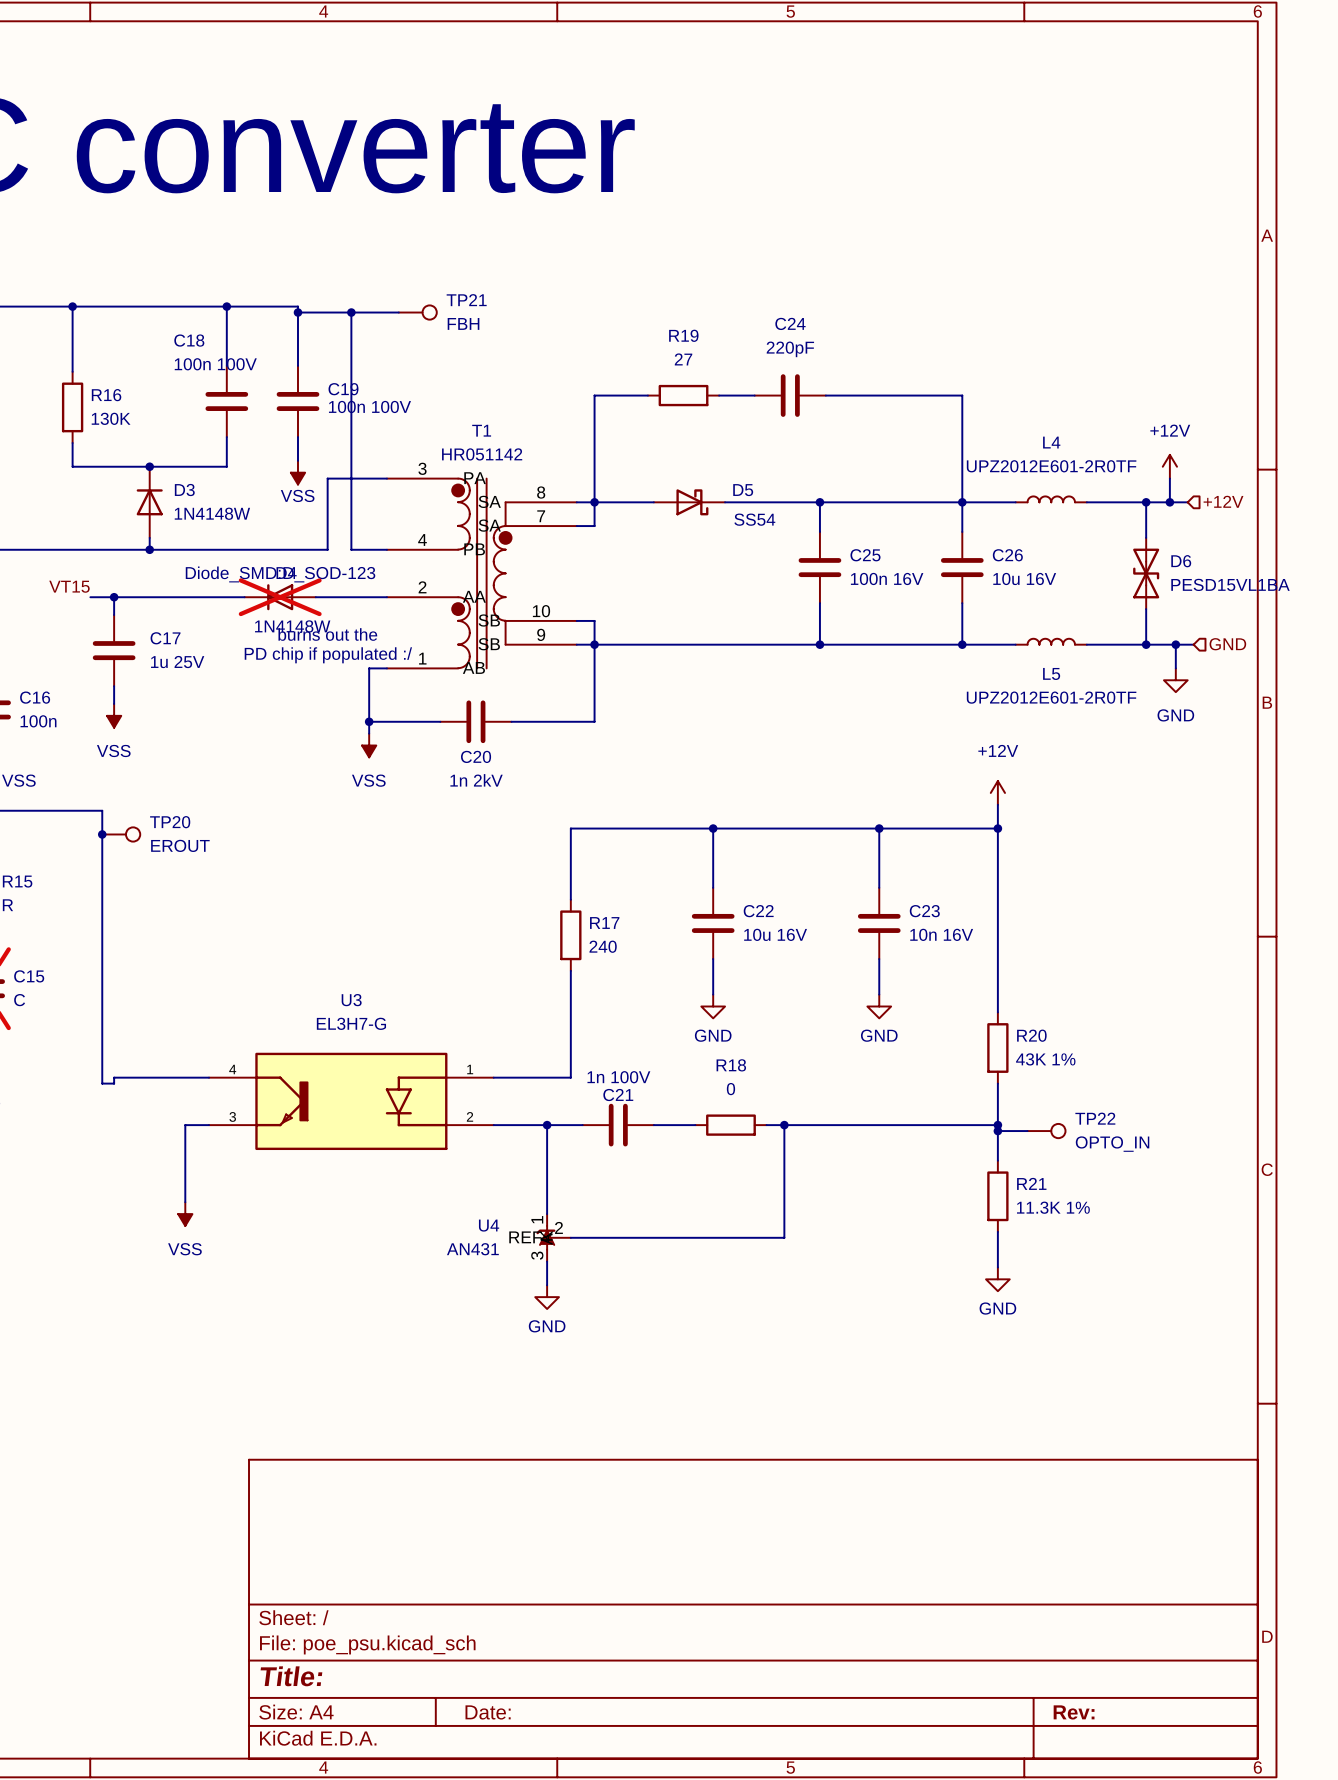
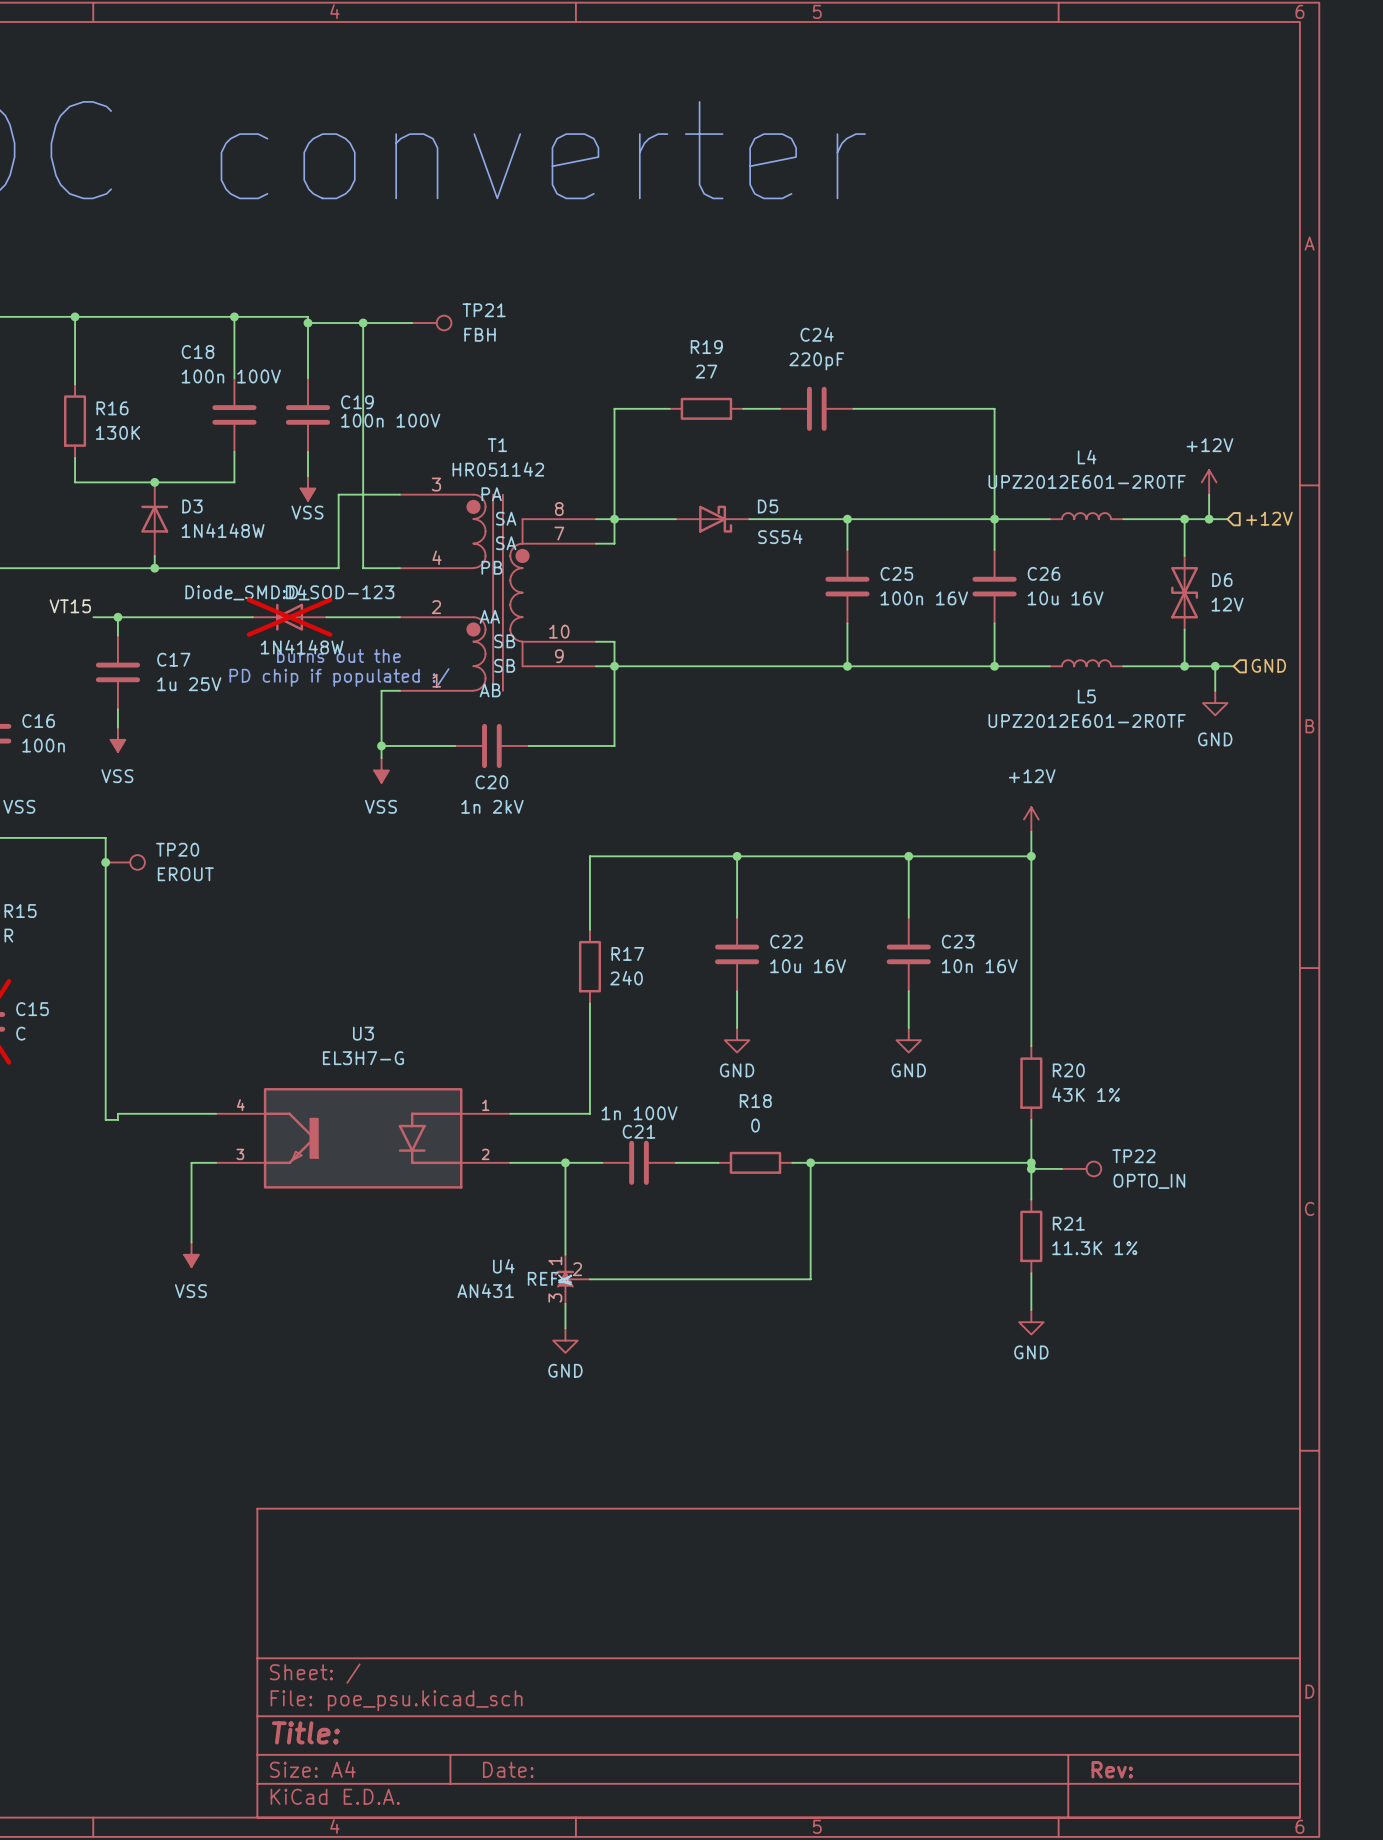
D6 value: PESD15VL1BA (1230, 584) -> 12V (1227, 604)

